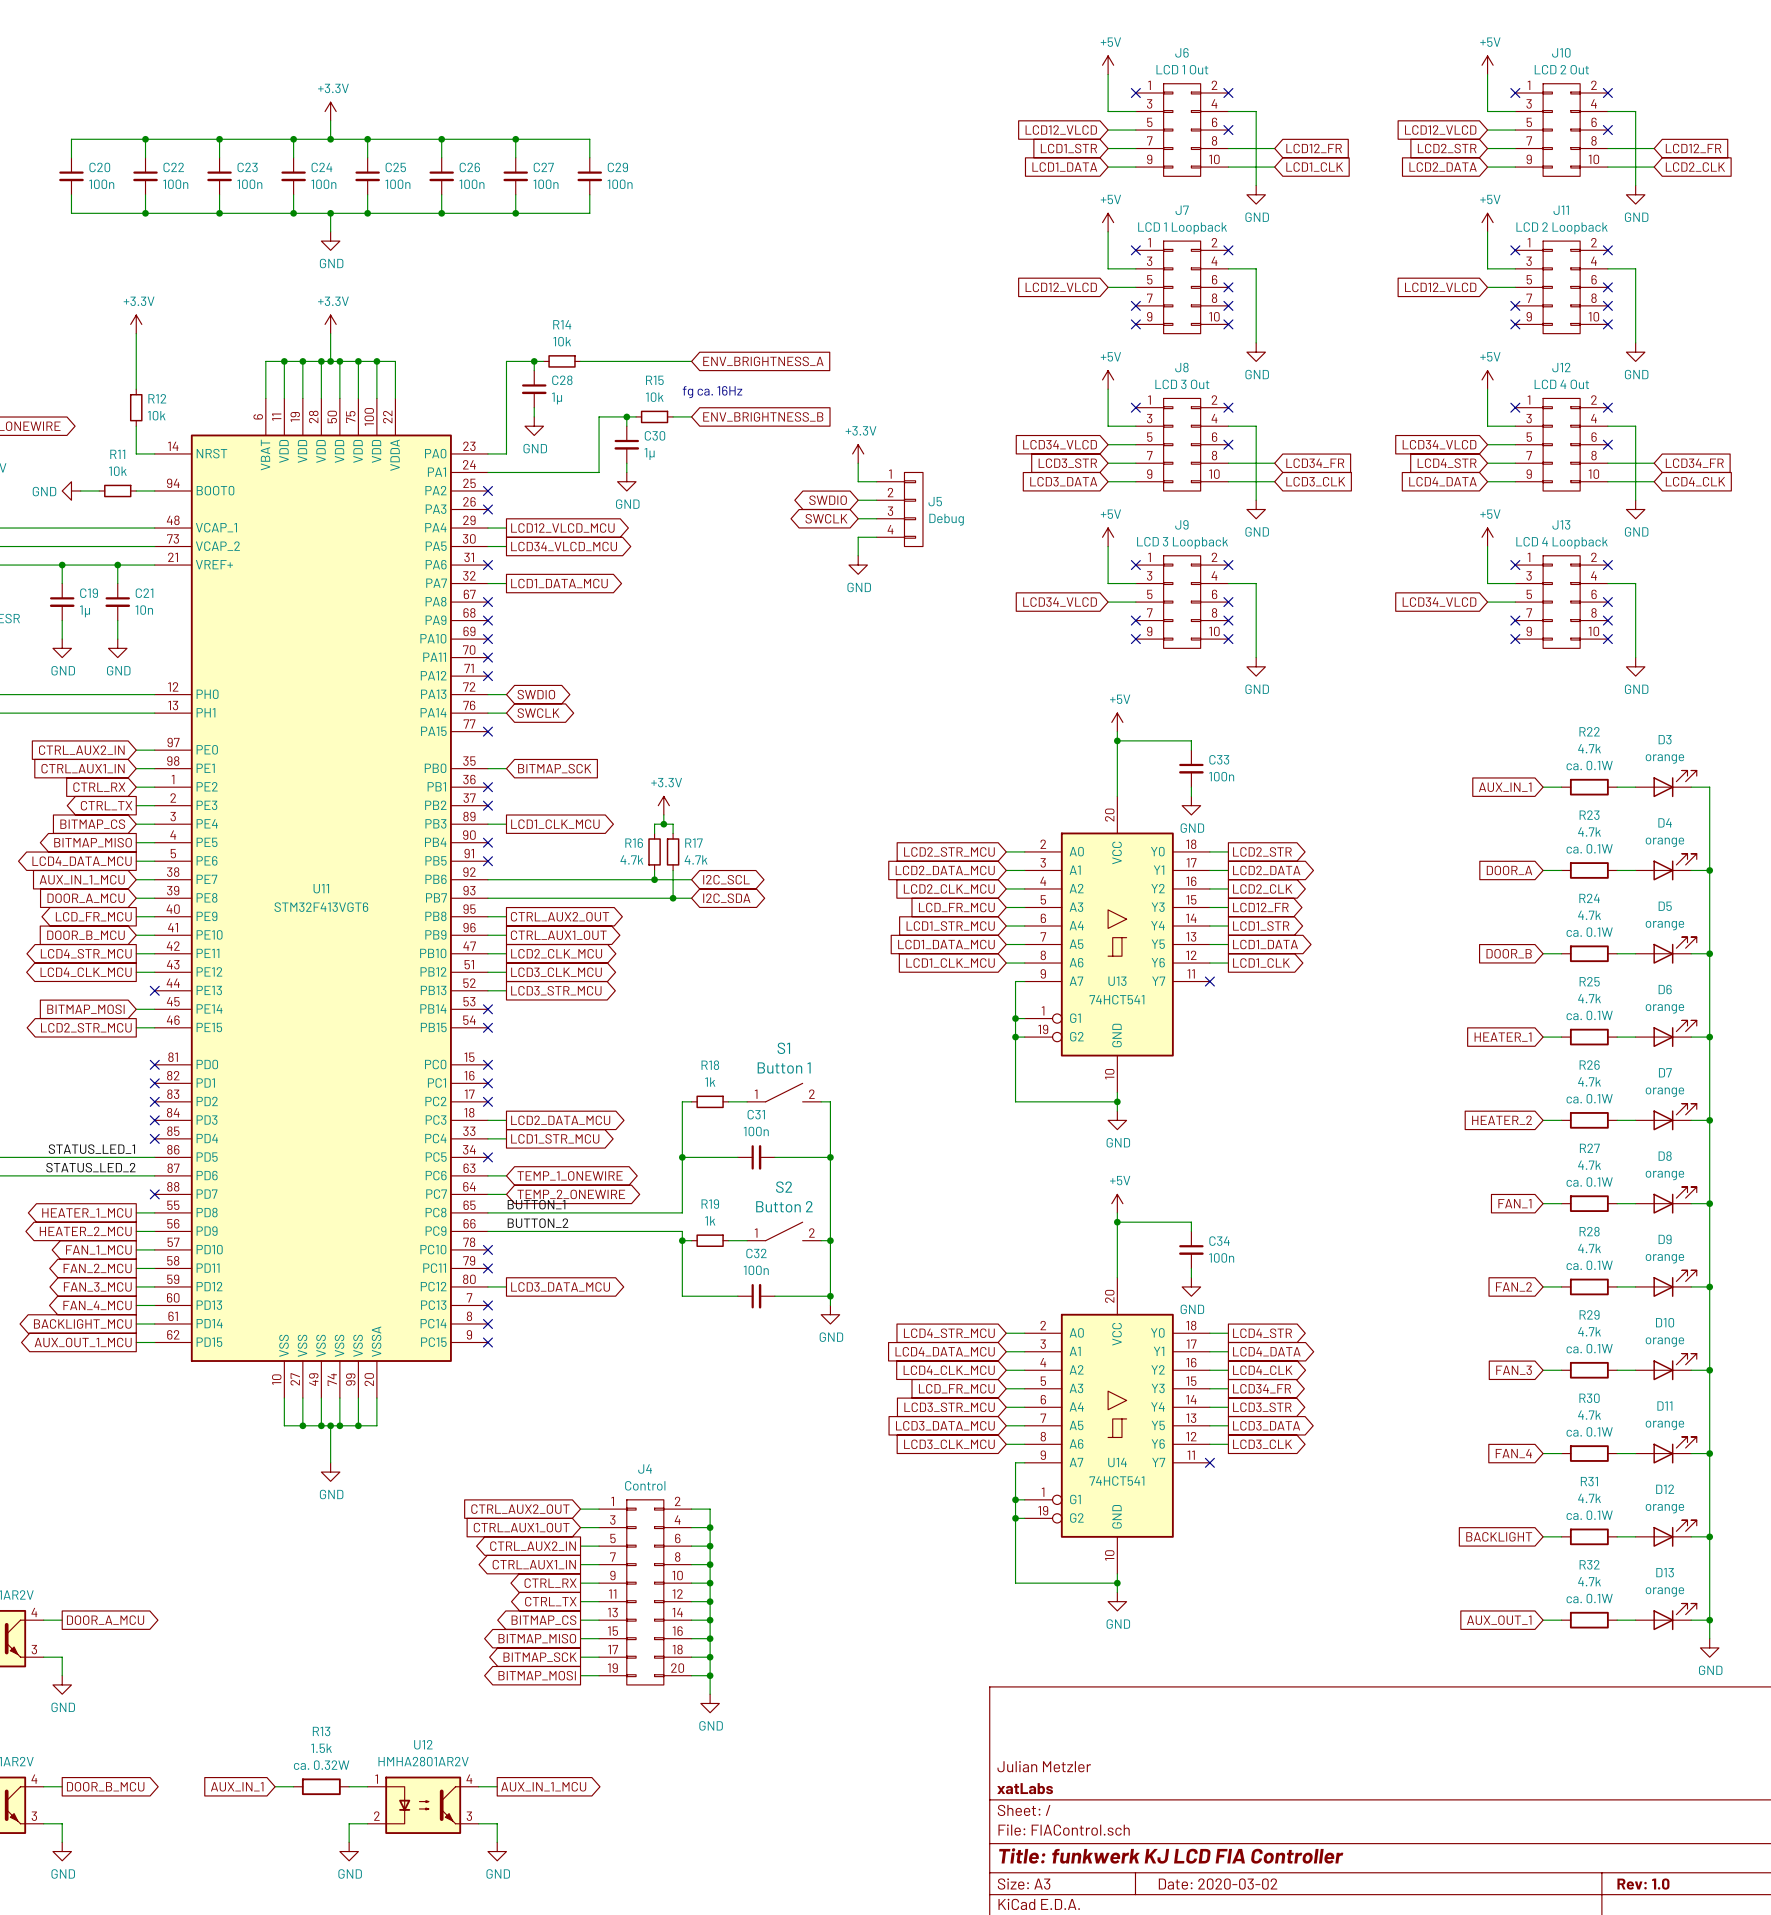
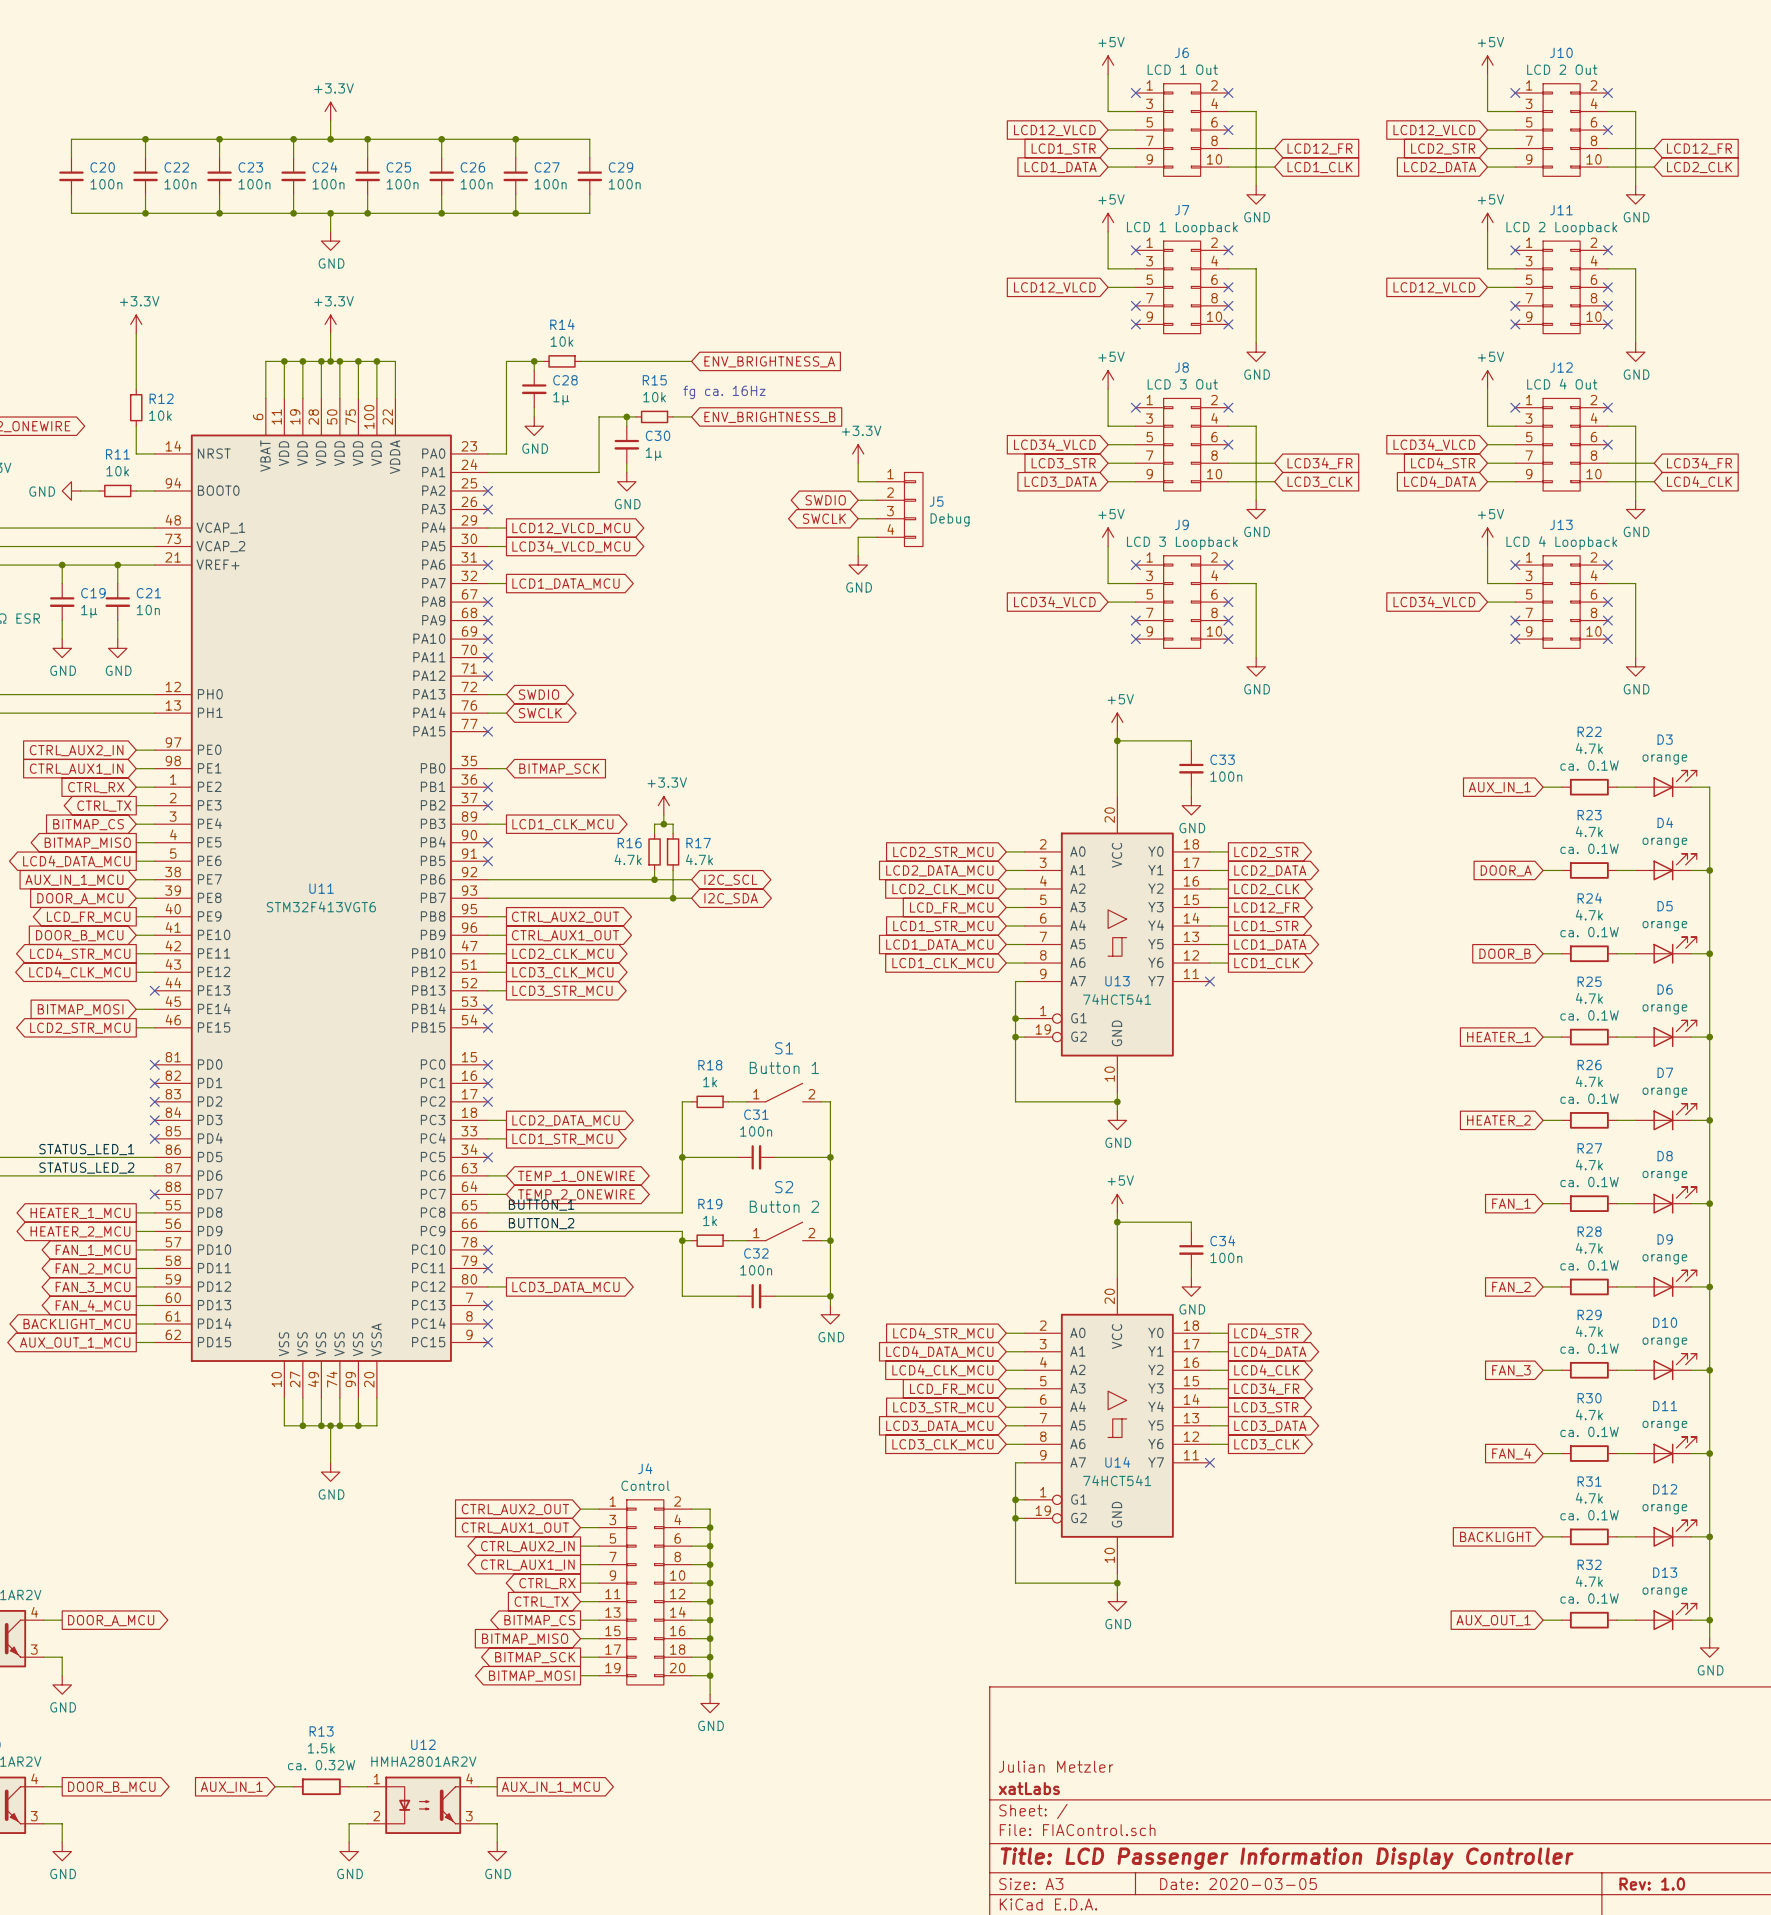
global label shape: output (550, 1601) -> input (541, 1602)
global label shape: output (537, 1638) -> input (525, 1639)
title block: Title: funkwerk KJ LCD FIA Controller (1171, 1855) -> Title: LCD Passenger Information Display Controller (1287, 1858)
title block: Date: 2020-03-02 (1218, 1884) -> Date: 2020-03-05 (1238, 1884)

